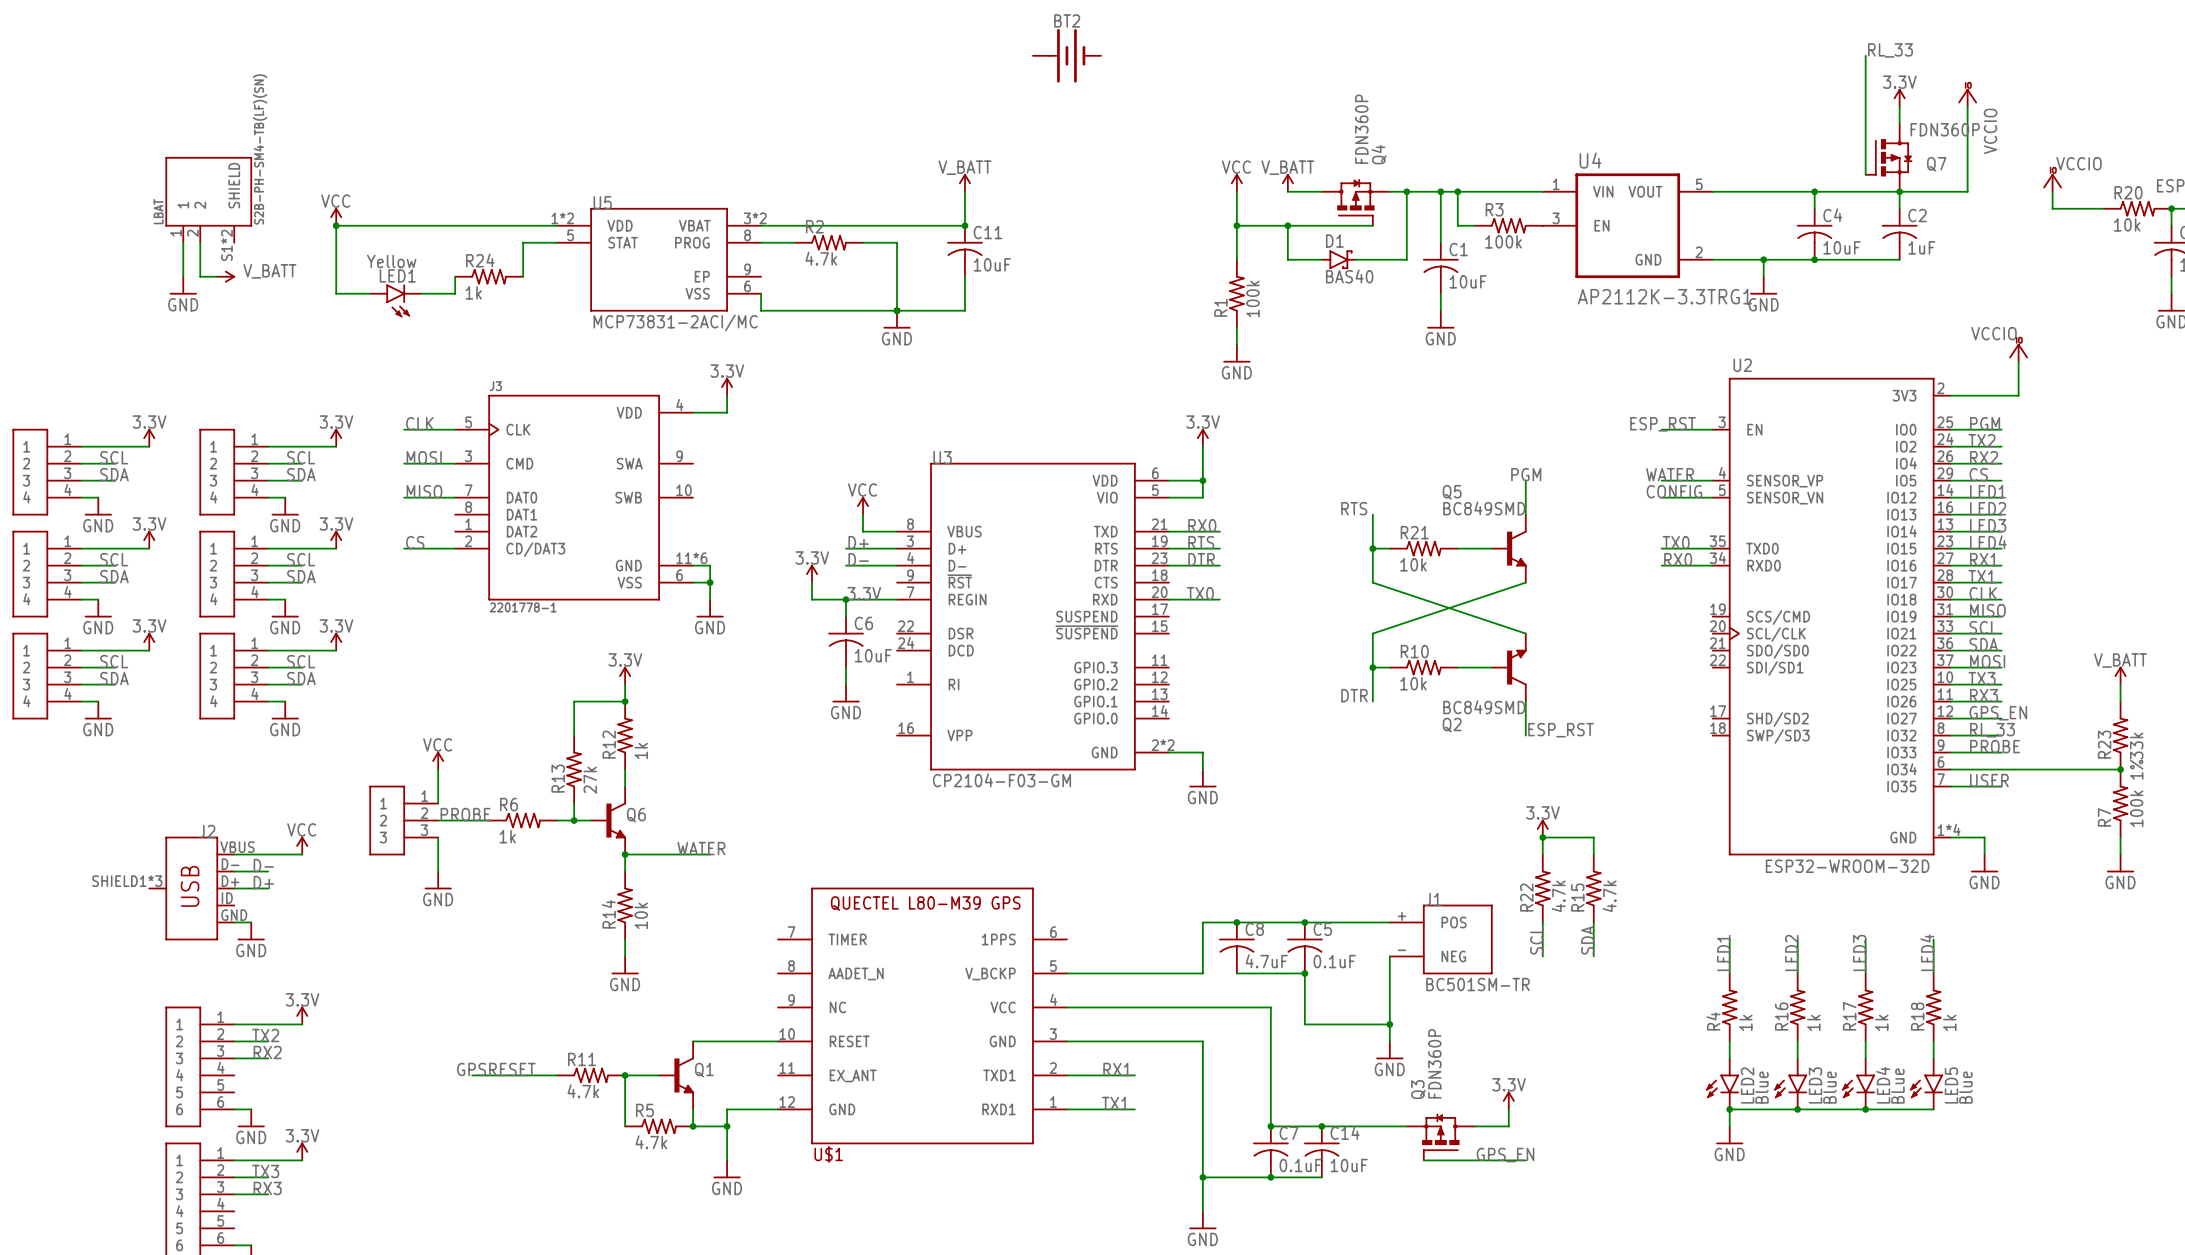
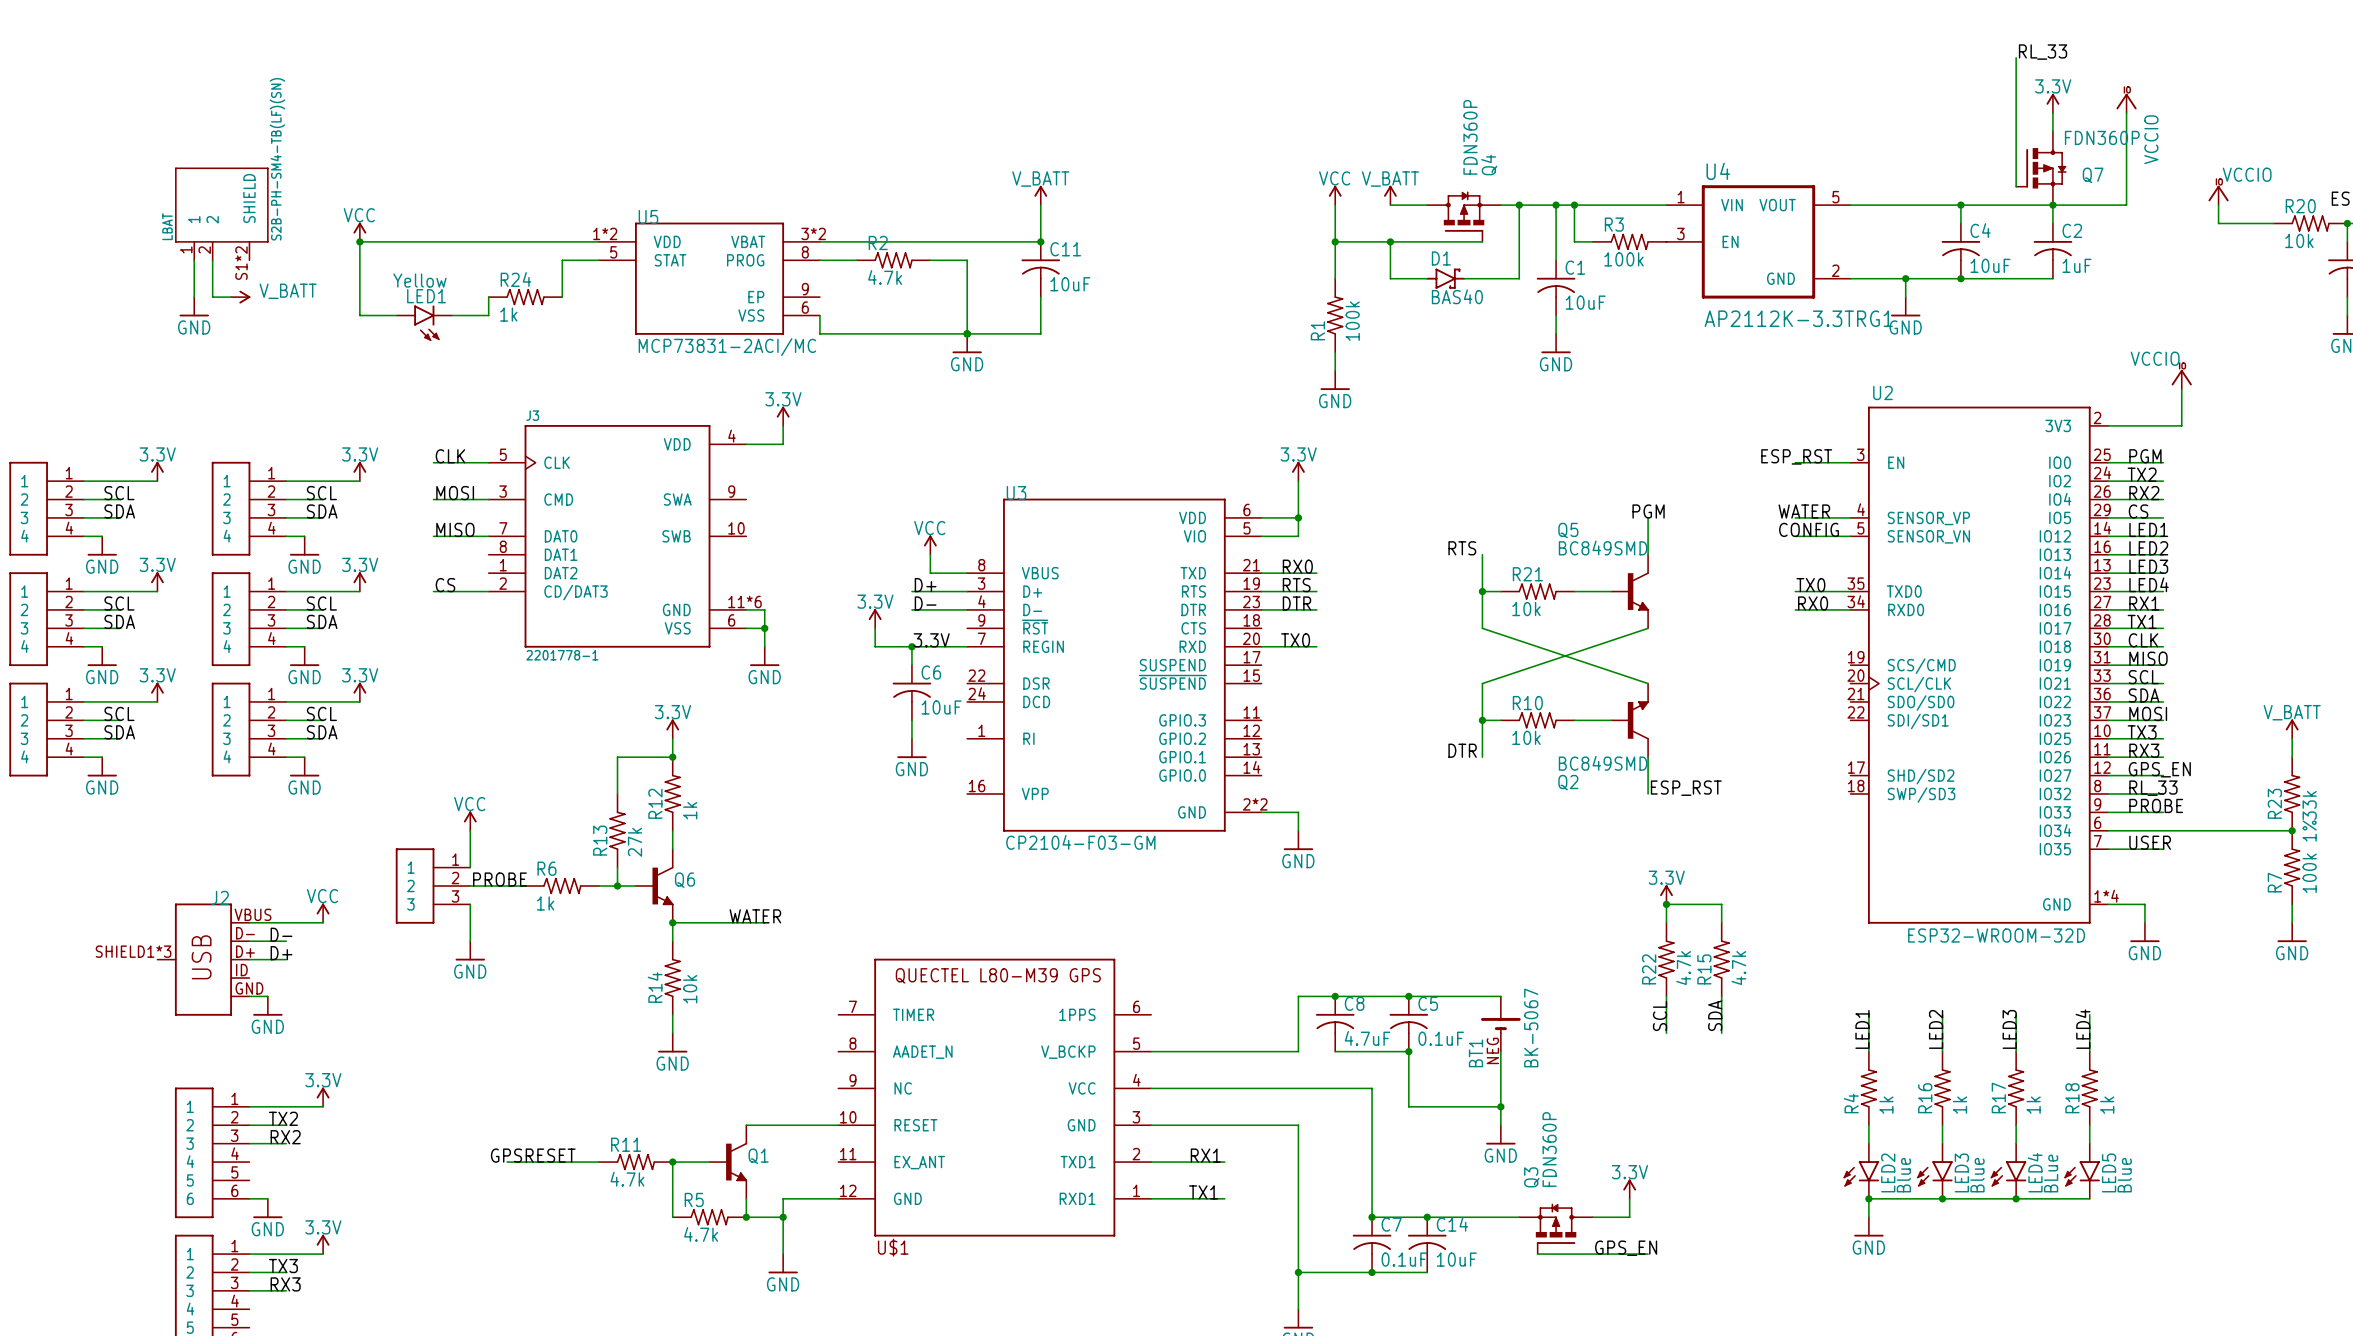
BT2: (1066, 55) -> none
J1: BC501SM-TR (1441, 939) -> none
BT1: none -> BK-5067 (1500, 1023)

